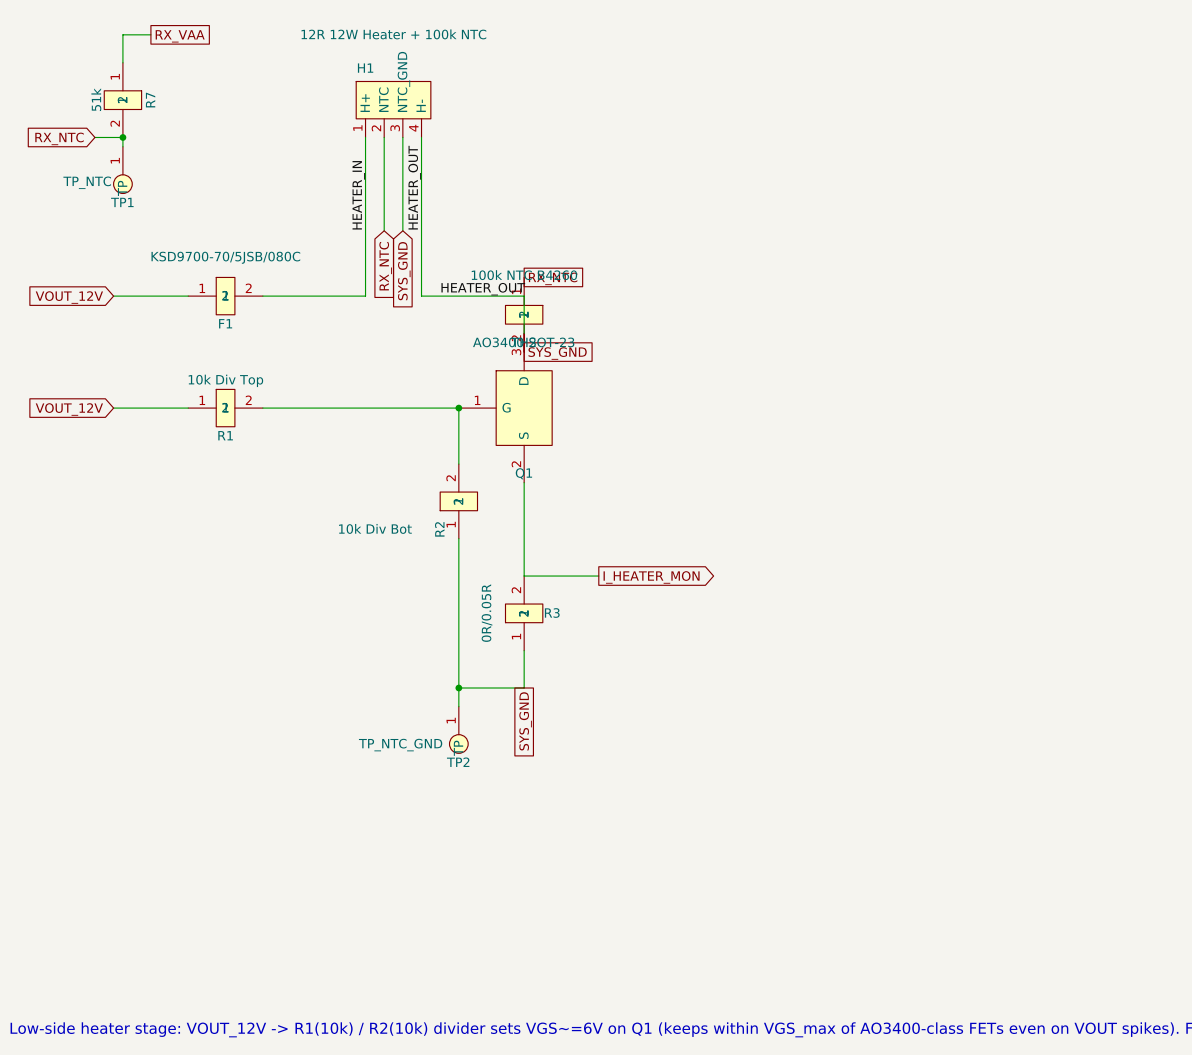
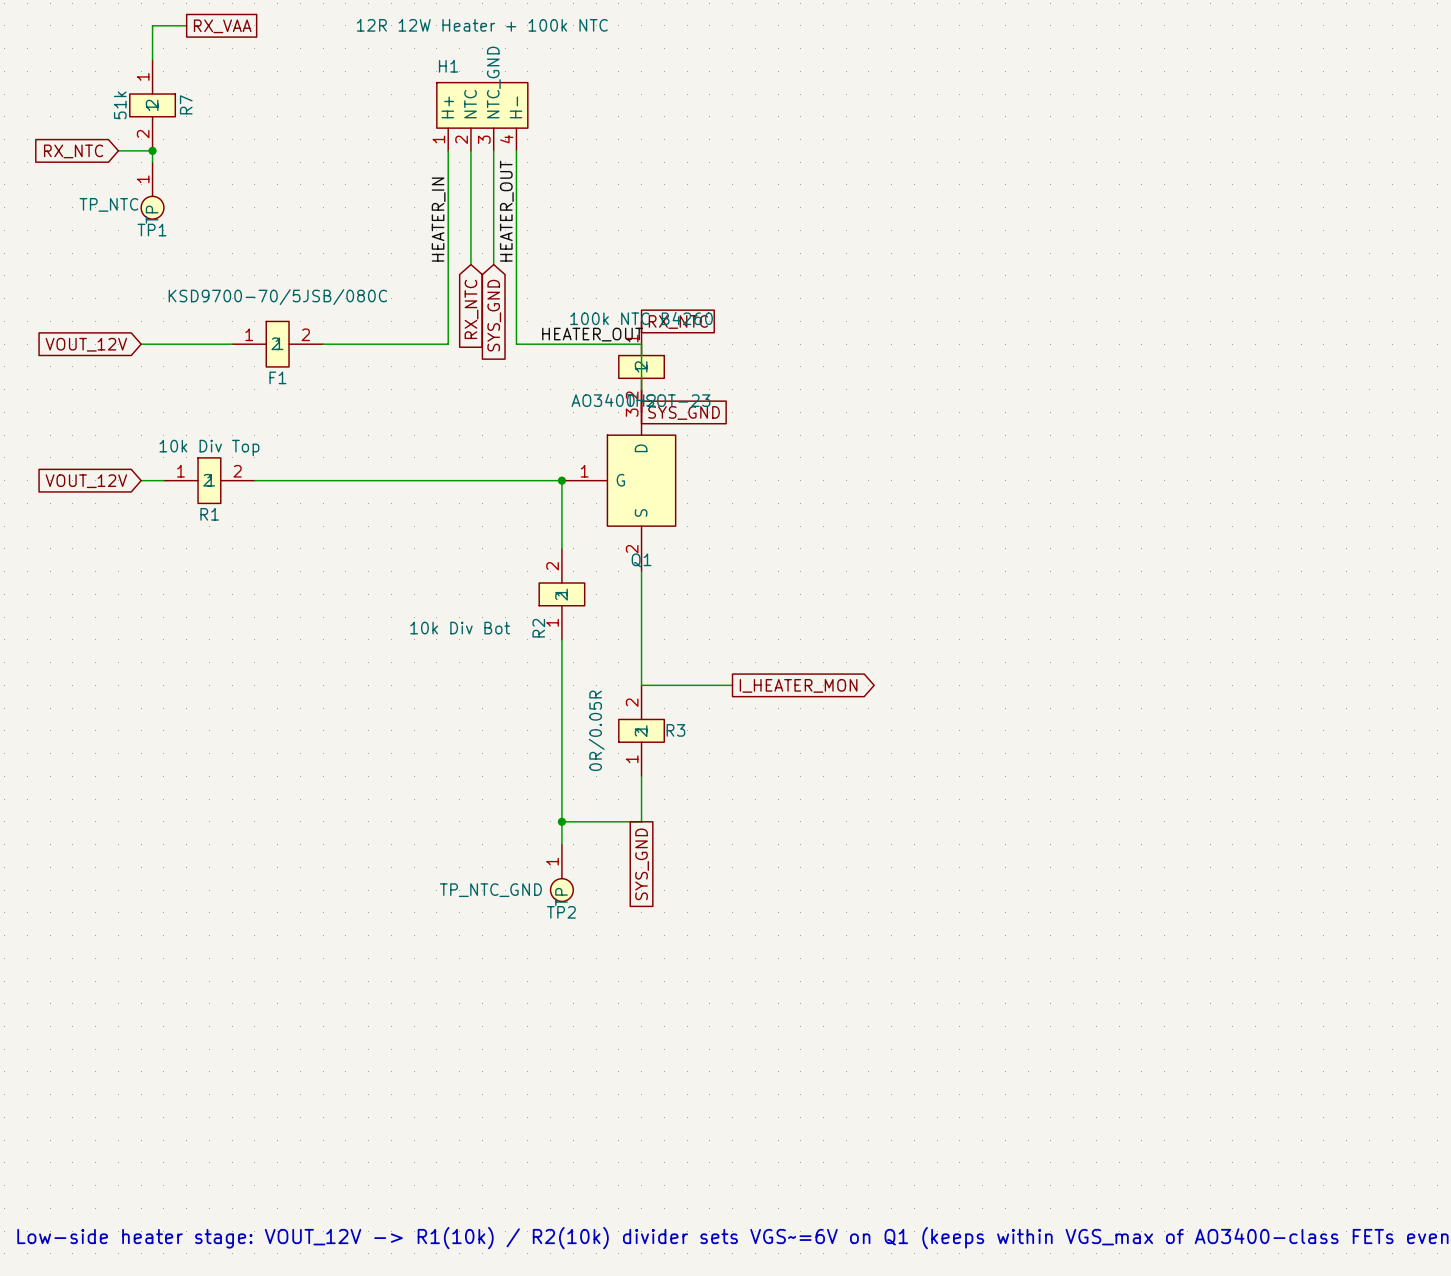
R1 position: (225, 408) -> (209, 480)

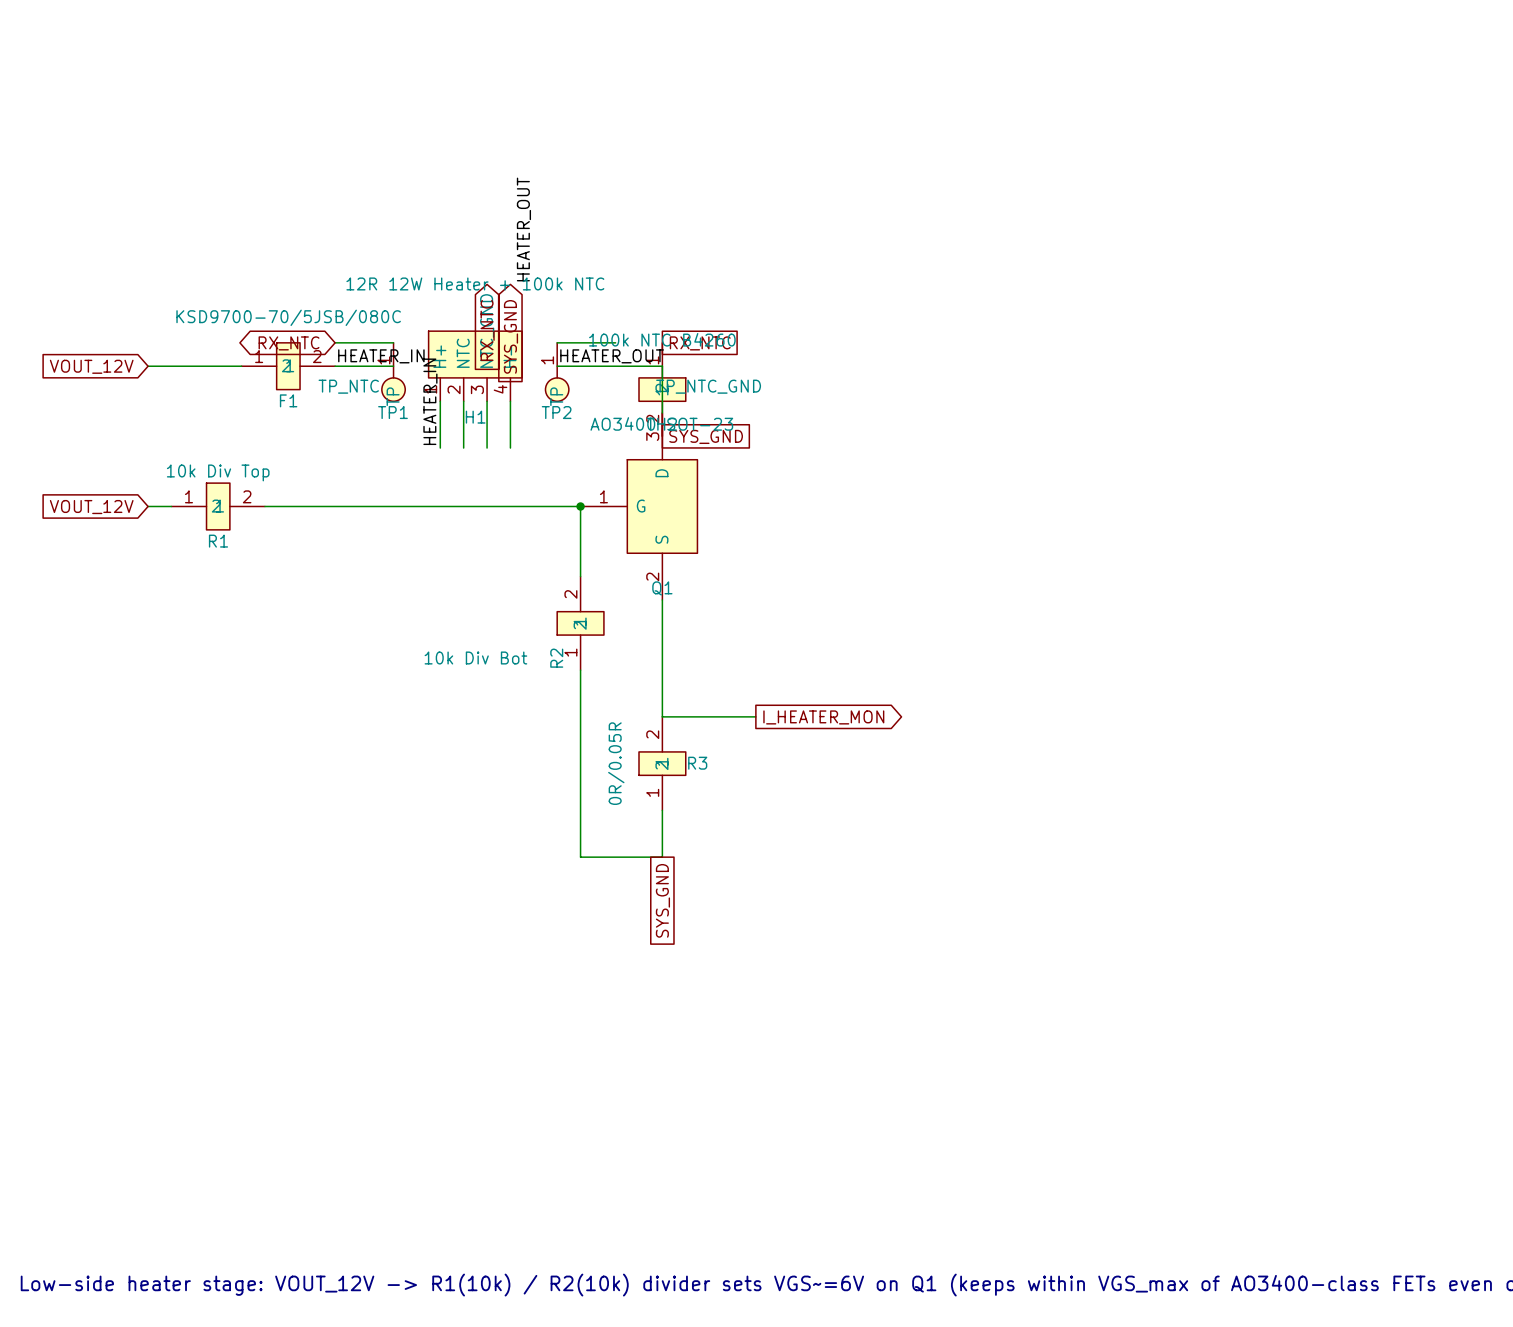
wire: (186, 25) (152, 25) (152, 59) -> none
H1 value position: 12R 12W Heater + 100k NTC (482, 25) -> 12R 12W Heater + 100k NTC (475, 283)
global label: RX_VAA (222, 26) -> none
H1 name position: H1 (448, 66) -> H1 (475, 417)
R7: 51k (152, 105) -> none
H1 position: (482, 116) -> (475, 365)
wire: (118, 150) (152, 150) (152, 162) -> none
junction: (152, 150) -> none
wire: (448, 150) (448, 344) (379, 344) -> none
wire: (470, 150) (470, 264) -> none
wire: (493, 150) (493, 264) -> none
wire: (516, 150) (516, 344) (539, 344) -> none
global label: RX_NTC (73, 151) -> none
TP1 position: (152, 191) -> (393, 372)
label: HEATER_IN (438, 219) -> none
global label: none -> RX_NTC (289, 343)
wire: none -> (335, 342) (393, 342)
wire: none -> (557, 342) (615, 342)
label: none -> HEATER_IN (381, 356)
label: none -> HEATER_IN (430, 401)
wire: none -> (440, 401) (440, 448)
wire: none -> (463, 401) (463, 448)
wire: none -> (487, 401) (487, 448)
wire: none -> (510, 401) (510, 448)
wire: (561, 821) (561, 844) -> none
junction: (561, 821) -> none
TP2 position: (561, 873) -> (557, 372)
TP2 value position: TP_NTC_GND (490, 890) -> TP_NTC_GND (708, 386)

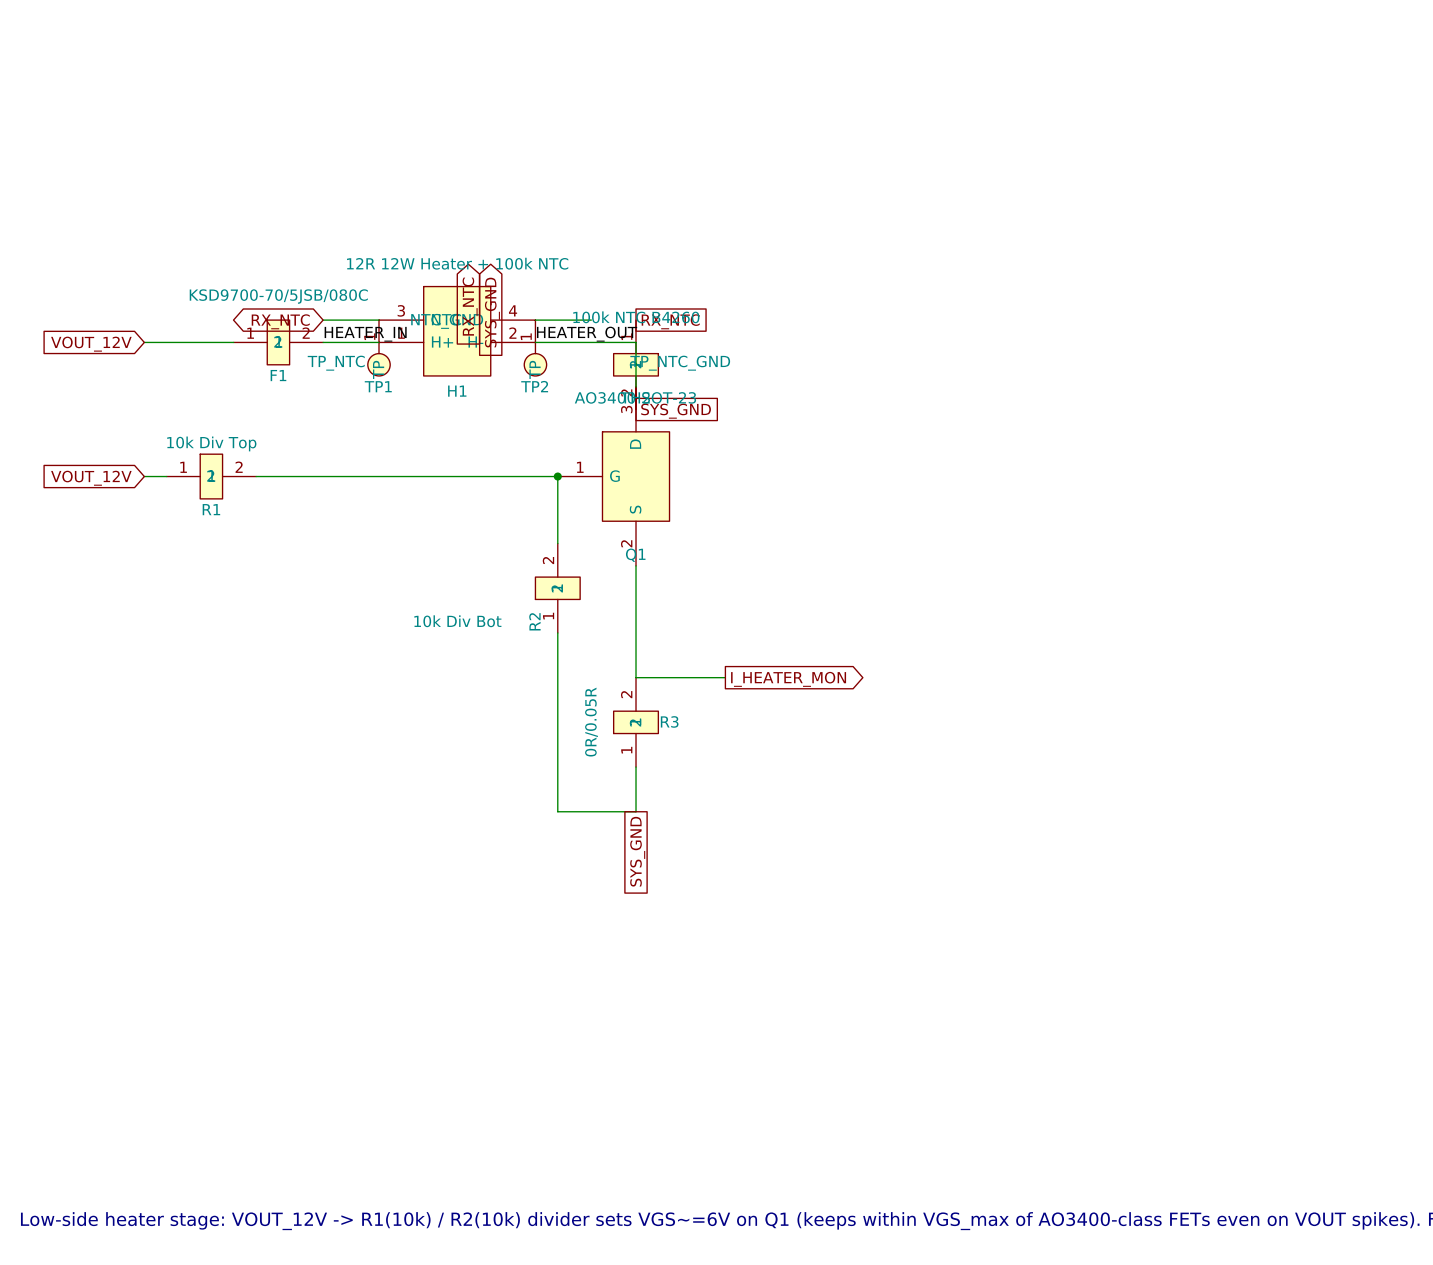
label: HEATER_OUT (523, 229) -> none
H1 symbol: [427, 330, 523, 402] -> [379, 285, 536, 377]
label: HEATER_IN (430, 401) -> none
wire: (440, 401) (440, 448) -> none
wire: (463, 401) (463, 448) -> none
wire: (487, 401) (487, 448) -> none
wire: (510, 401) (510, 448) -> none

